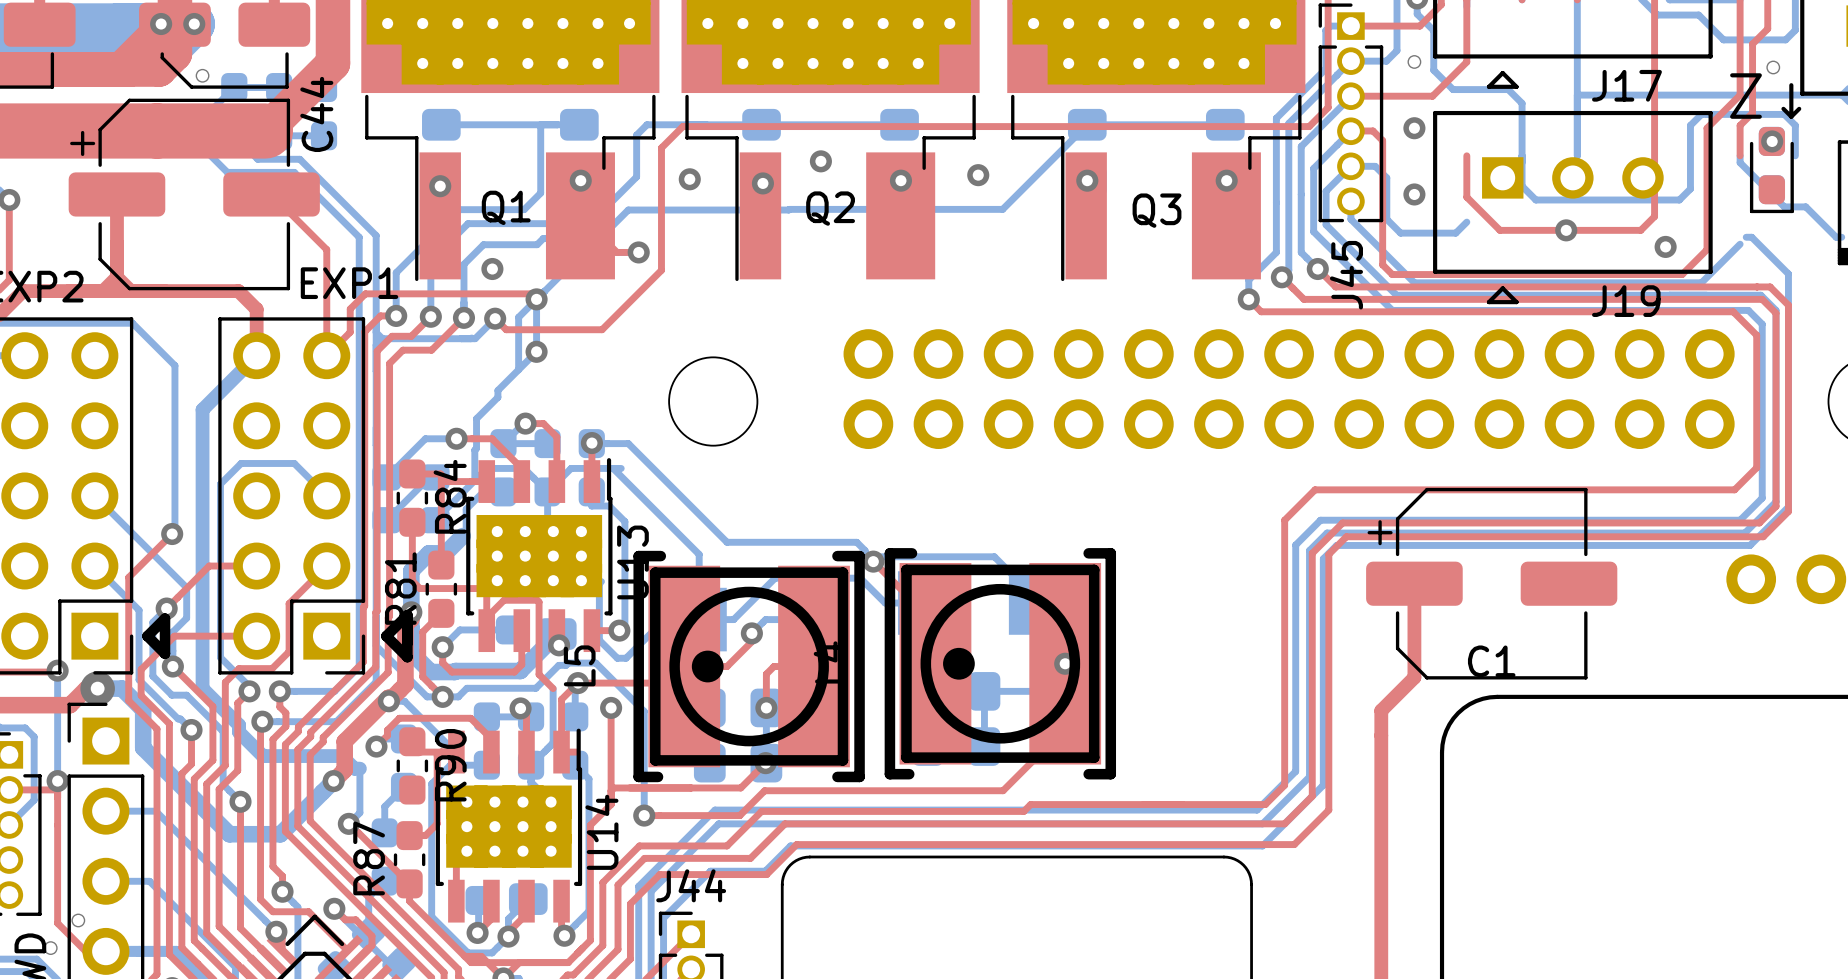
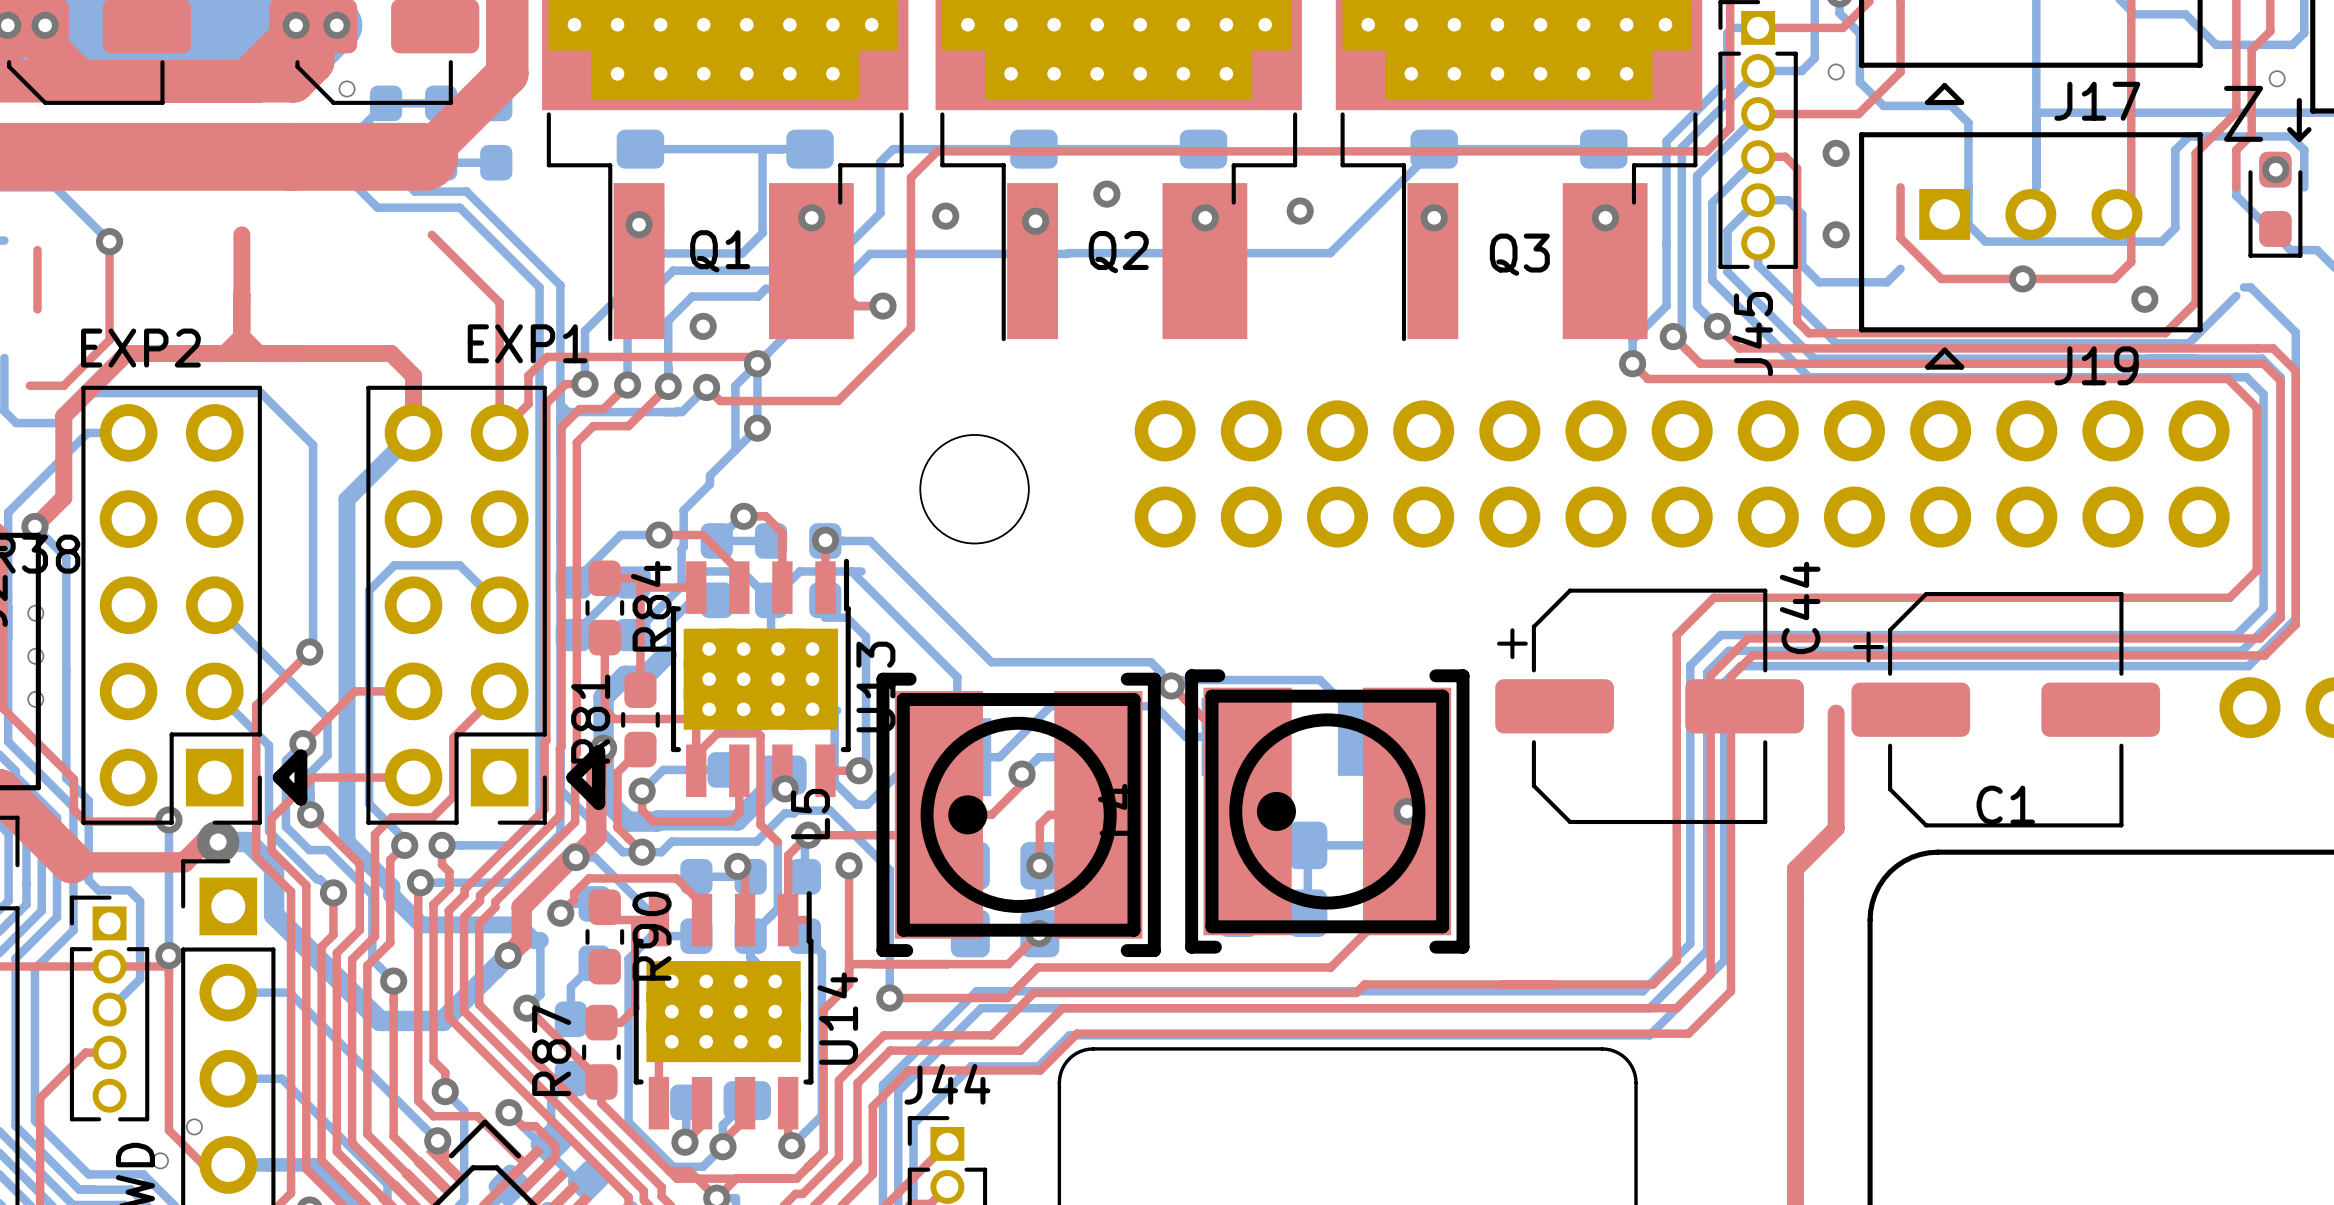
C44 footprint: [68, 98, 320, 291] -> [1495, 588, 1804, 825]
C1 position: (1491, 583) -> (2005, 709)

